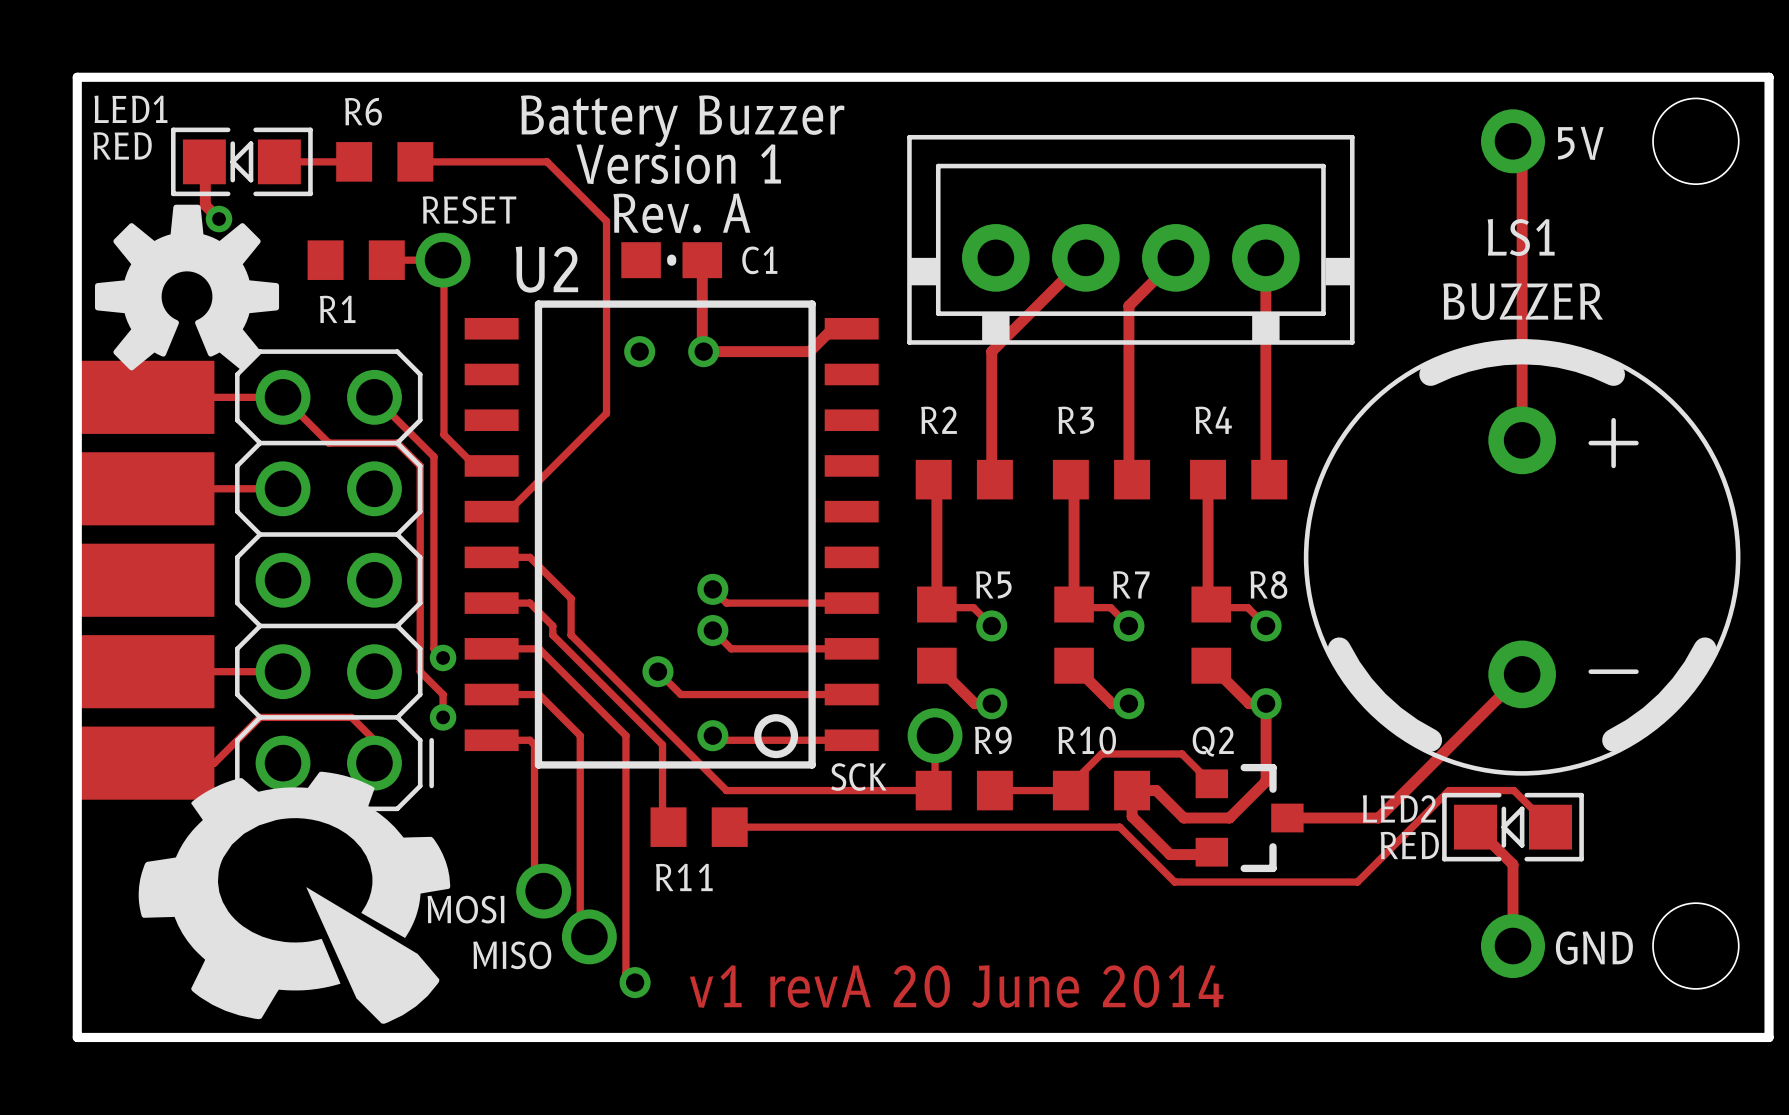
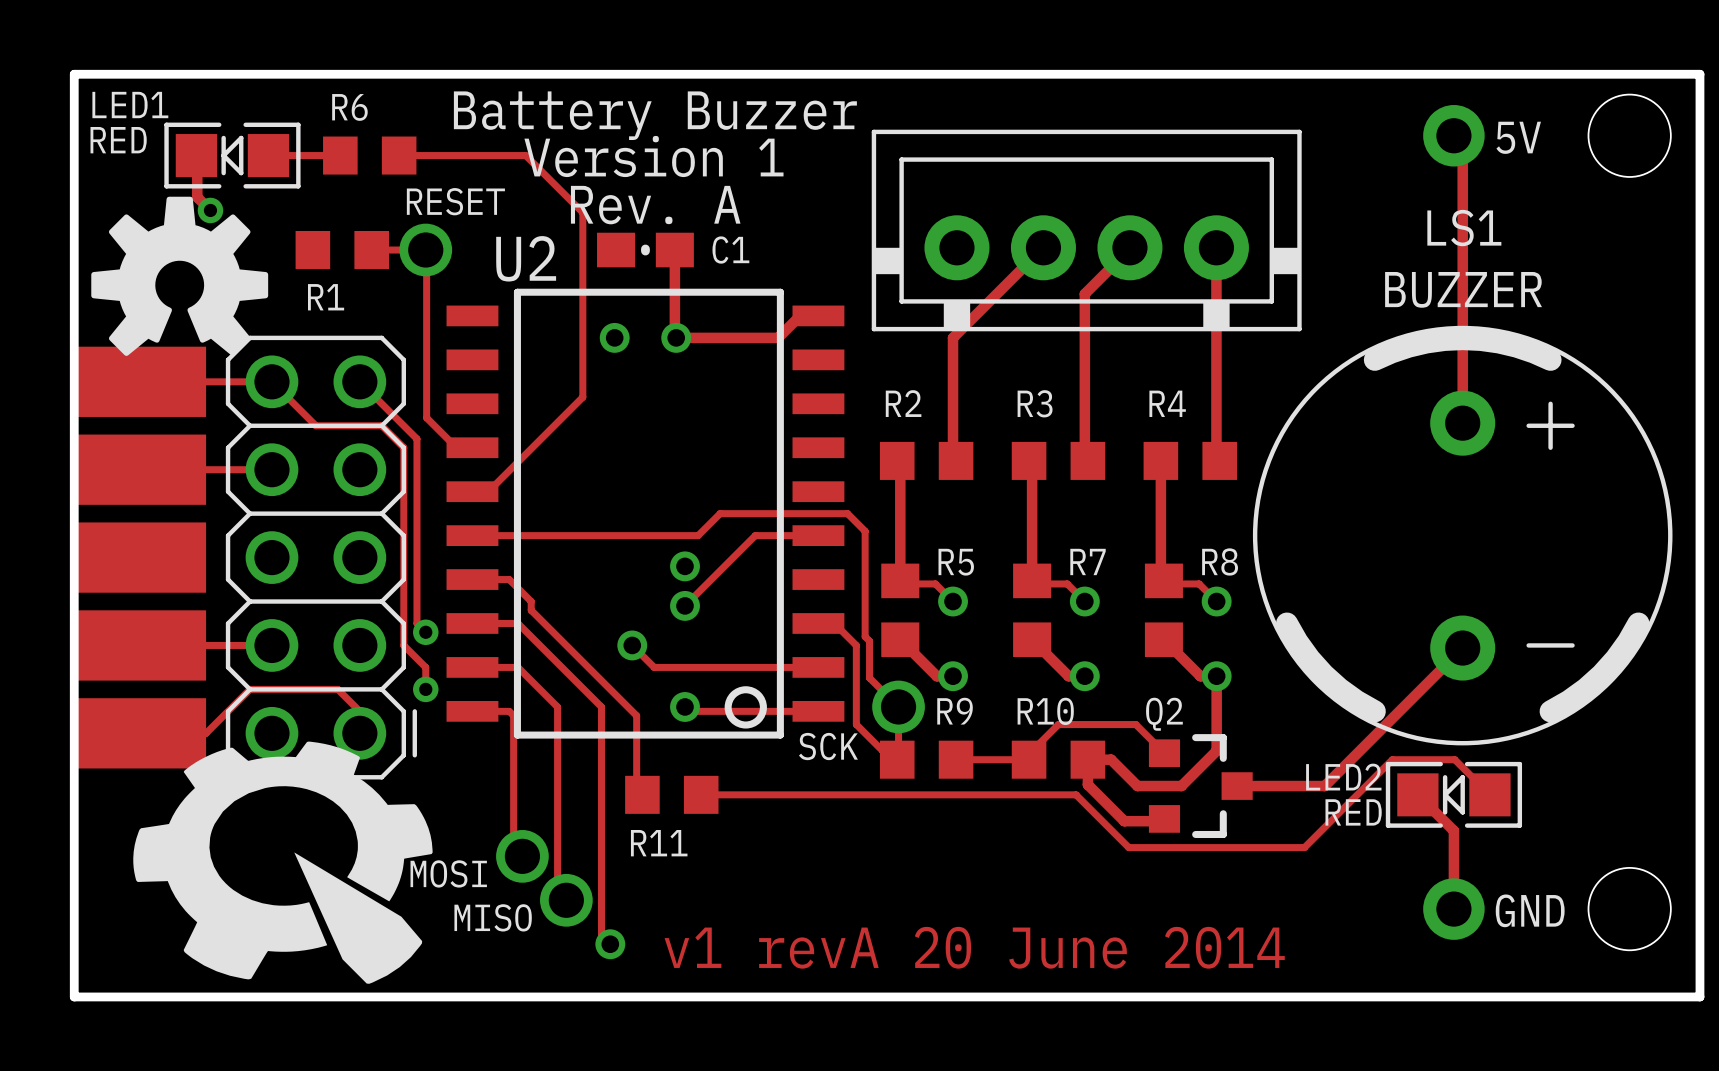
track: (529, 557) (571, 598) (571, 635) (726, 790) (933, 790) -> (509, 535) (698, 535) (720, 513) (847, 513) (865, 531) (865, 636) (869, 641) (869, 677) (898, 706)
track: (712, 589) (726, 603) (851, 603) -> none
track: (712, 630) (731, 648) (851, 648) -> (685, 605) (755, 535) (818, 535)
track: none -> (818, 623) (834, 623) (856, 645) (856, 724) (882, 750) (888, 750) (897, 759)

